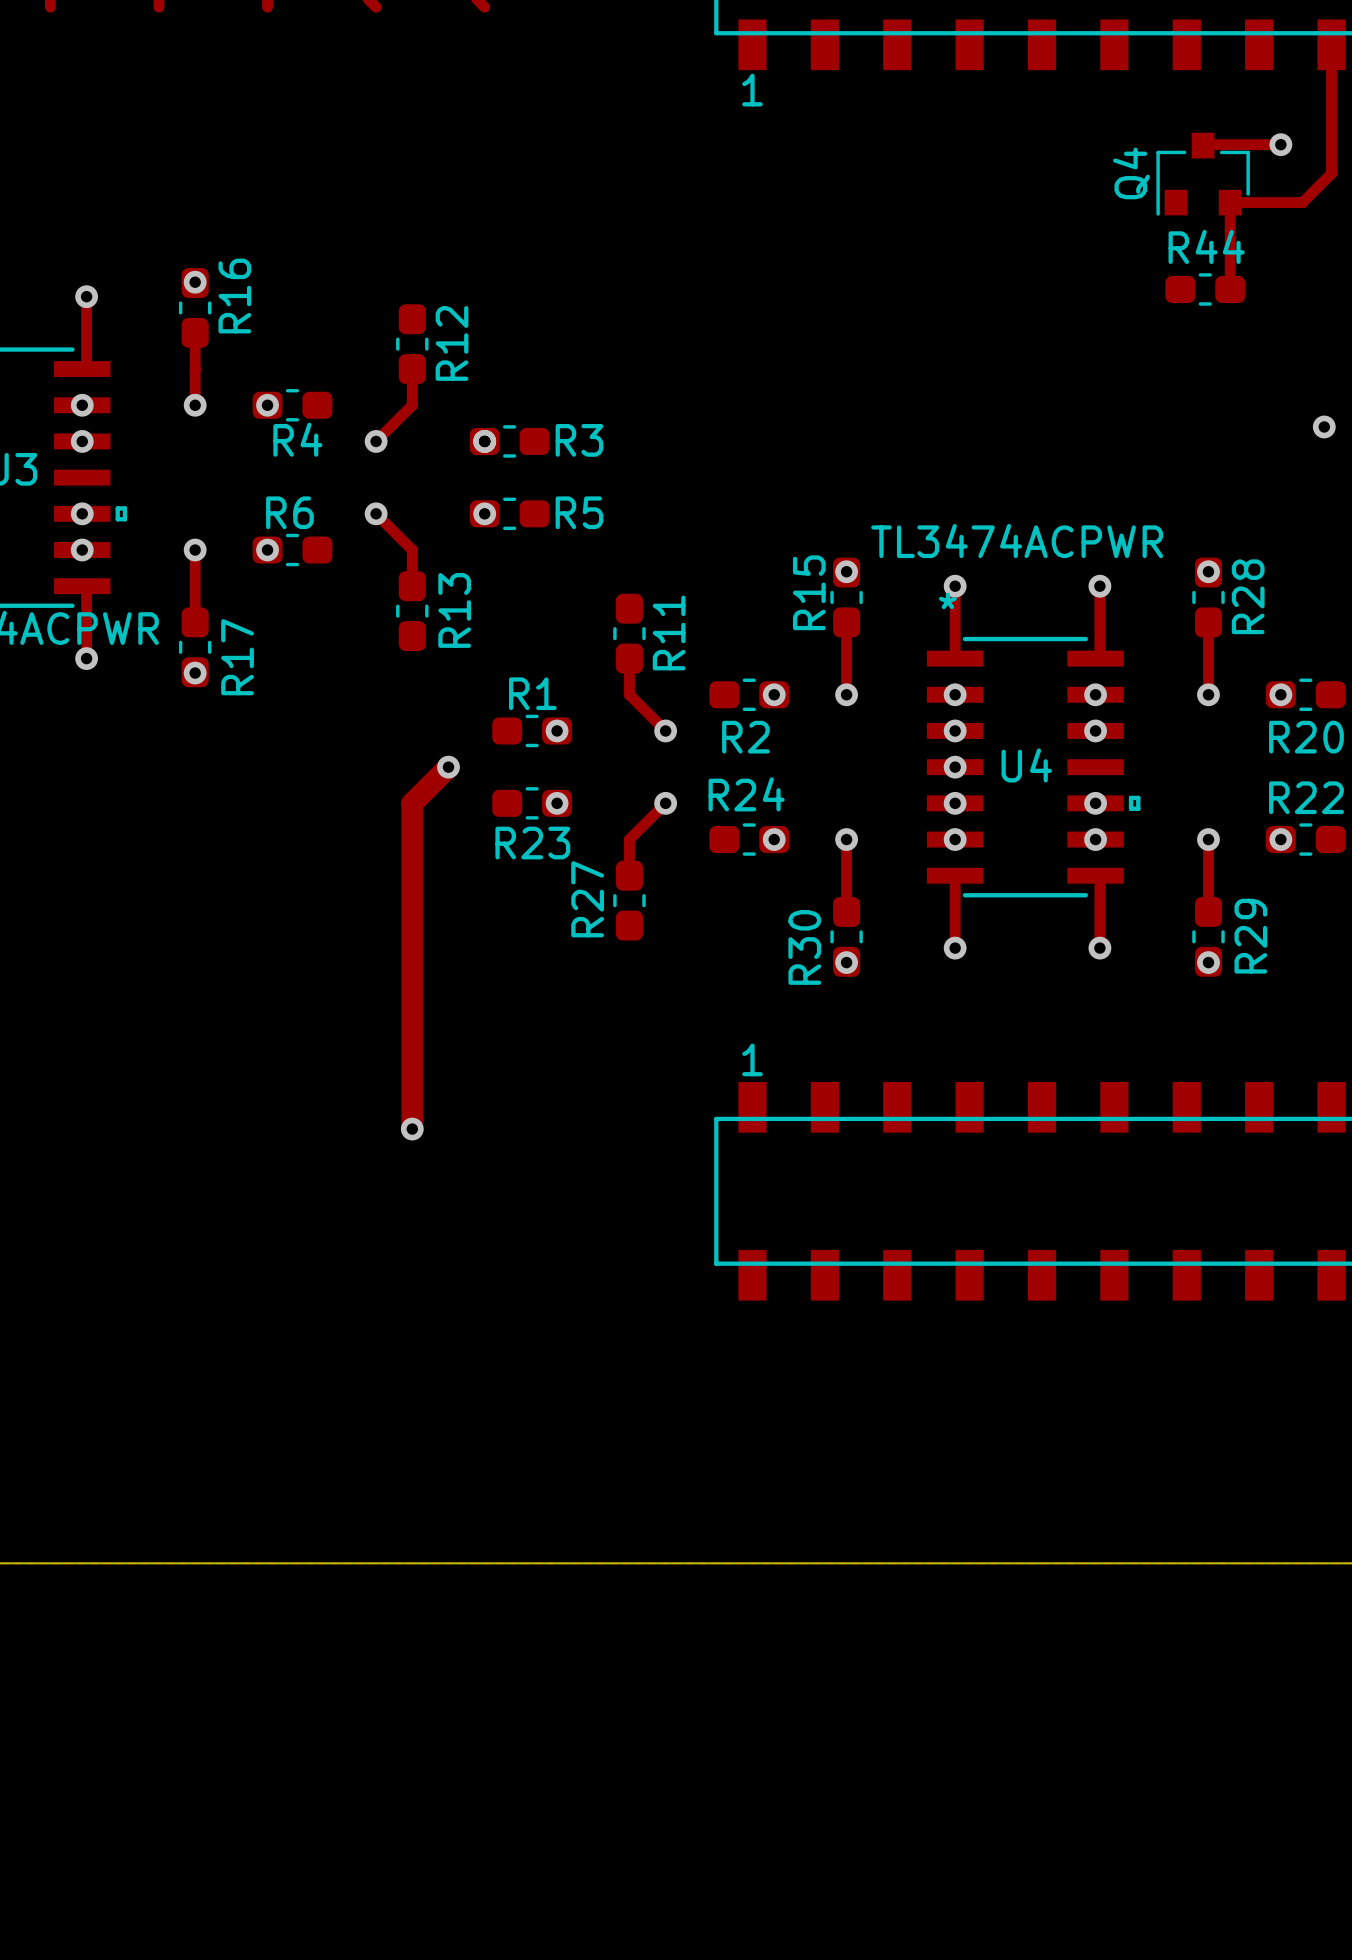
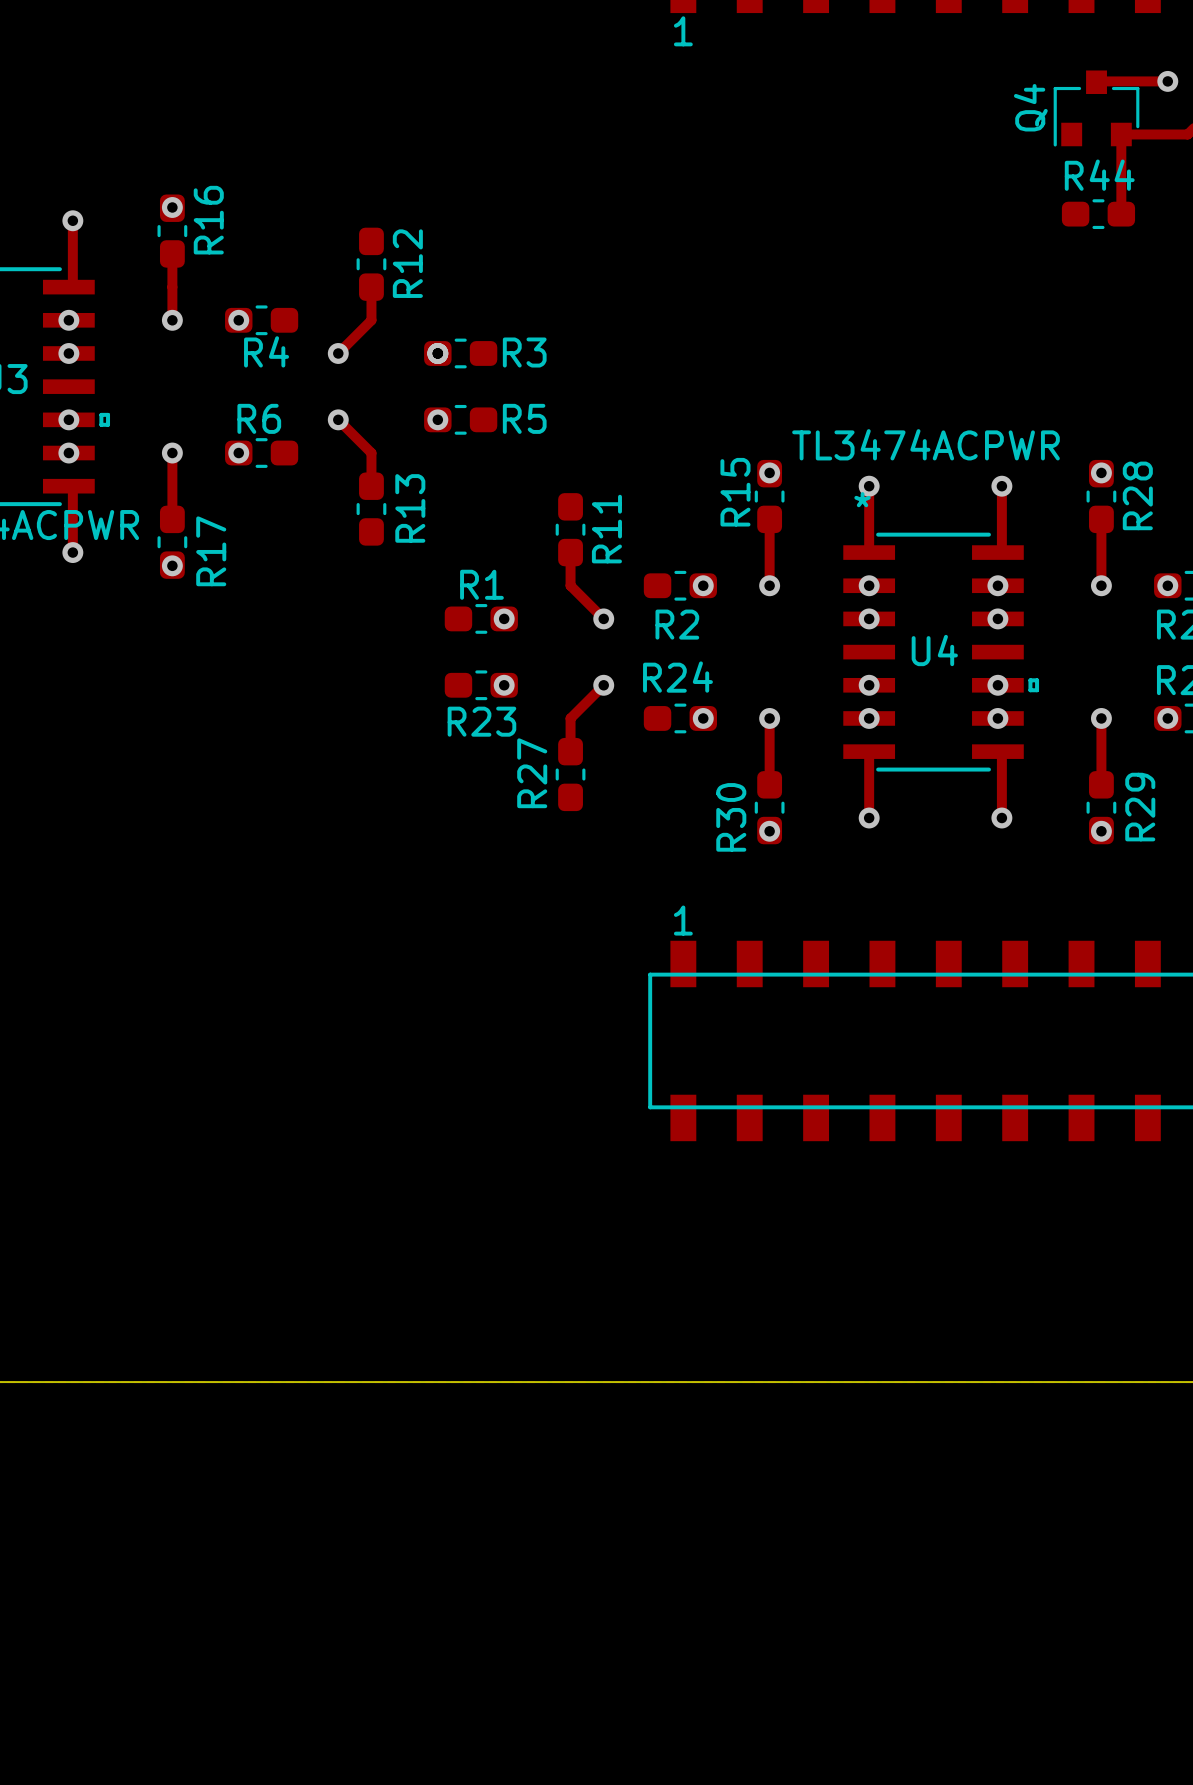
track: (448, 767) (412, 803) (412, 1129) -> none
via: (448, 767) -> none
via: (955, 767) -> none
via: (412, 1129) -> none

